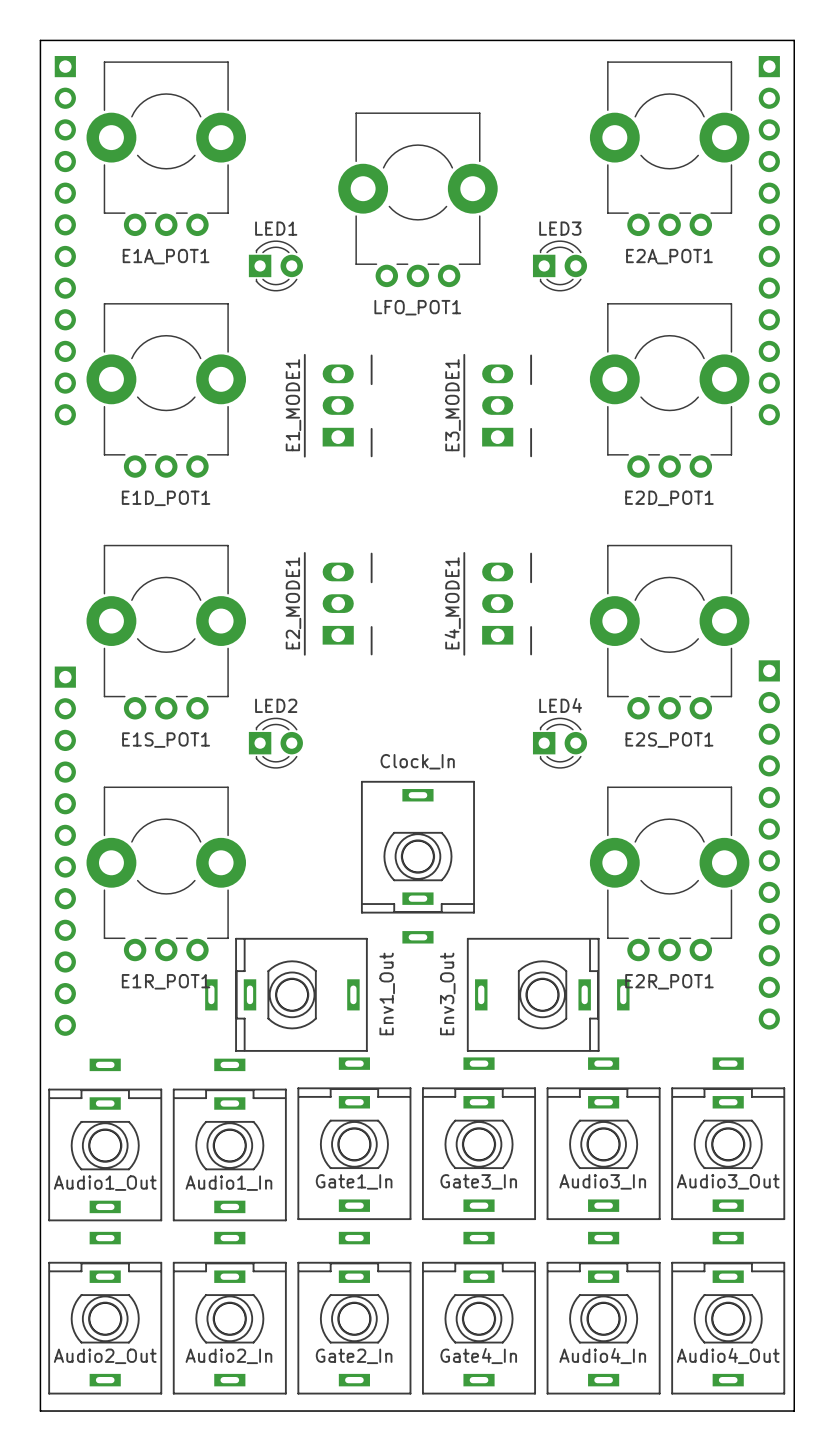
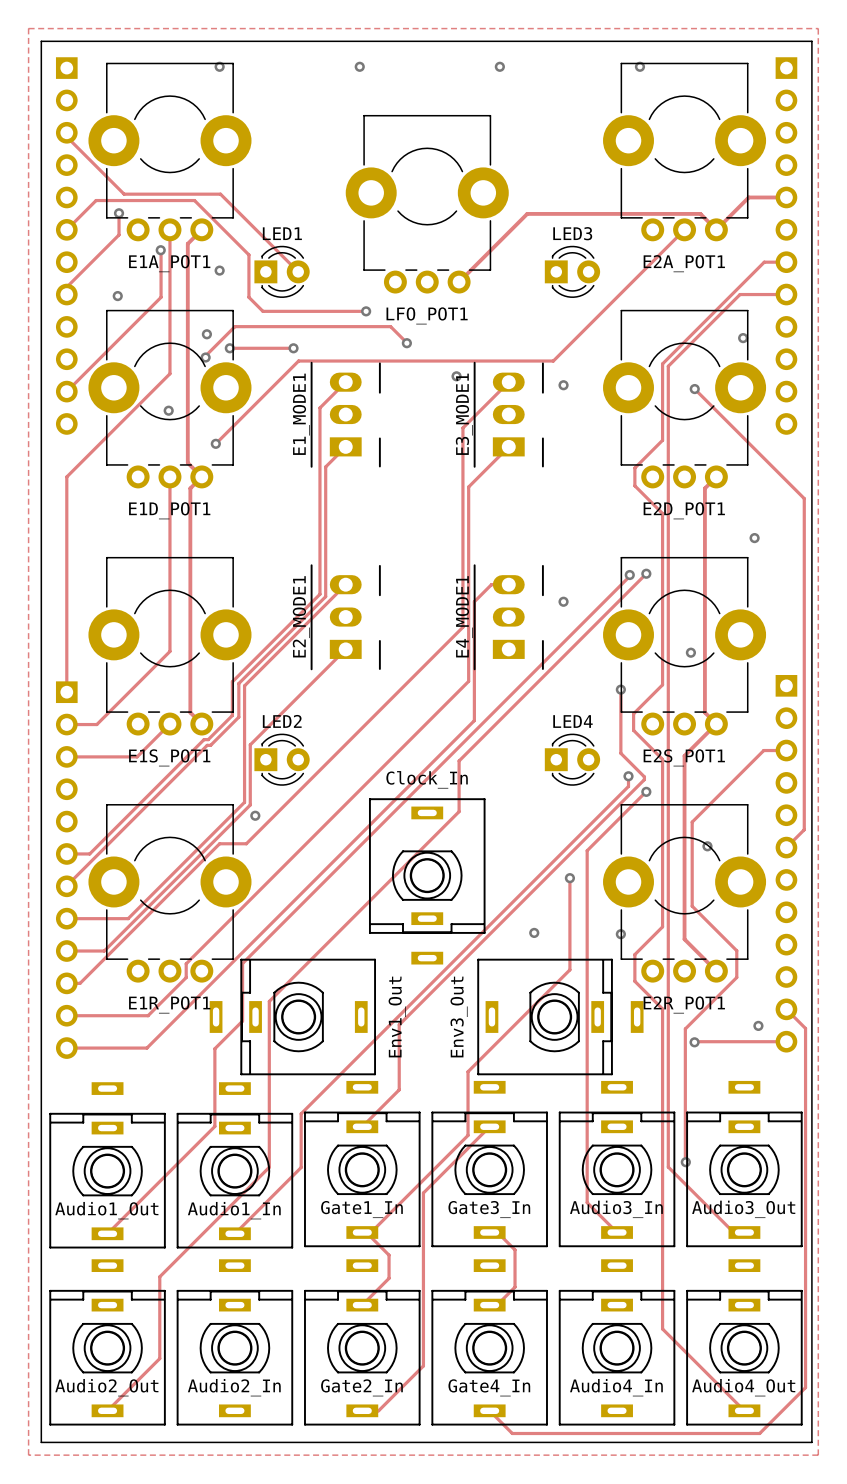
zone outline: none -> (28, 28) (28, 1455) (818, 1455) (818, 28) (28, 28)
via: none -> (219, 66)
via: none -> (359, 66)
via: none -> (499, 66)
via: none -> (639, 66)
track: none -> (66, 132) (66, 136) (124, 194) (220, 194) (298, 271)
track: none -> (786, 197) (748, 197) (716, 229) (700, 213) (527, 213) (459, 282)
track: none -> (119, 213) (119, 234) (66, 287) (66, 294)
via: none -> (119, 213)
track: none -> (66, 229) (96, 200) (194, 200) (248, 254) (248, 297) (262, 311) (366, 311)
track: none -> (169, 229) (169, 373) (66, 476) (66, 692)
track: none -> (201, 229) (187, 243) (187, 462) (201, 476) (190, 488) (190, 712) (201, 724)
track: none -> (684, 229) (553, 361) (298, 361) (215, 443)
track: none -> (160, 250) (161, 297) (66, 391)
via: none -> (160, 250)
track: none -> (786, 262) (764, 262) (662, 363) (662, 440) (634, 468) (634, 485) (662, 513) (662, 684) (633, 713) (633, 730) (662, 759) (662, 926) (634, 954) (634, 981) (662, 1009) (662, 1328) (744, 1410)
via: none -> (219, 270)
track: none -> (786, 294) (740, 294) (668, 366) (668, 1167) (733, 1232) (744, 1232)
via: none -> (117, 296)
via: none -> (366, 311)
via: none -> (206, 334)
via: none -> (743, 338)
track: none -> (406, 343) (390, 326) (234, 326) (205, 357)
via: none -> (406, 343)
track: none -> (229, 348) (293, 348)
via: none -> (229, 348)
via: none -> (293, 348)
via: none -> (205, 357)
via: none -> (456, 376)
track: none -> (345, 382) (319, 407) (319, 594) (232, 681) (232, 715) (208, 739) (204, 739) (89, 853) (66, 853)
track: none -> (508, 382) (462, 428) (462, 627) (246, 843) (219, 843) (80, 983) (66, 983)
via: none -> (563, 385)
track: none -> (694, 389) (804, 498) (804, 829) (786, 847)
via: none -> (694, 389)
via: none -> (168, 410)
via: none -> (215, 443)
track: none -> (345, 446) (325, 466) (325, 596) (238, 683) (238, 717) (210, 745) (207, 745) (70, 882) (70, 886)
track: none -> (508, 446) (468, 486) (468, 681) (186, 963) (186, 977) (148, 1015) (66, 1015)
track: none -> (169, 476) (169, 651) (96, 724) (66, 724)
track: none -> (716, 476) (704, 488) (704, 712) (716, 724) (684, 755) (684, 939) (716, 971)
via: none -> (754, 538)
track: none -> (646, 573) (459, 760) (459, 811) (269, 1001) (269, 1167) (159, 1276) (159, 1358) (107, 1410)
via: none -> (646, 573)
track: none -> (629, 575) (242, 963) (242, 1021) (214, 1048) (214, 1126) (107, 1233)
via: none -> (629, 575)
track: none -> (345, 584) (244, 685) (244, 802) (128, 918) (66, 918)
track: none -> (508, 584) (491, 584) (474, 601) (474, 720) (146, 1048) (66, 1048)
via: none -> (563, 601)
track: none -> (345, 649) (250, 744) (250, 805) (104, 951) (66, 951)
via: none -> (690, 652)
track: none -> (620, 689) (620, 753) (644, 776) (644, 779) (399, 1024) (399, 1089) (362, 1126)
via: none -> (620, 689)
track: none -> (169, 724) (137, 756) (66, 756)
track: none -> (786, 750) (763, 750) (692, 822) (692, 906) (736, 950) (736, 977) (685, 1028) (685, 1162)
track: none -> (628, 776) (628, 786) (301, 1113) (301, 1167) (234, 1233)
via: none -> (628, 776)
track: none -> (646, 791) (587, 850) (587, 1202) (617, 1232)
via: none -> (646, 791)
via: none -> (255, 815)
via: none -> (707, 846)
track: none -> (569, 878) (569, 969) (468, 1071) (468, 1135) (370, 1232)
via: none -> (569, 878)
via: none -> (534, 932)
via: none -> (620, 934)
track: none -> (786, 1009) (805, 1028) (805, 1387) (759, 1433) (512, 1433) (489, 1410)
via: none -> (758, 1025)
via: none -> (694, 1042)
track: none -> (786, 1041) (694, 1042)
track: none -> (489, 1126) (423, 1193) (423, 1365) (378, 1410) (362, 1410)
via: none -> (685, 1162)
track: none -> (366, 1232) (389, 1255) (389, 1278) (362, 1305)
track: none -> (497, 1232) (515, 1249) (515, 1287) (497, 1305)

